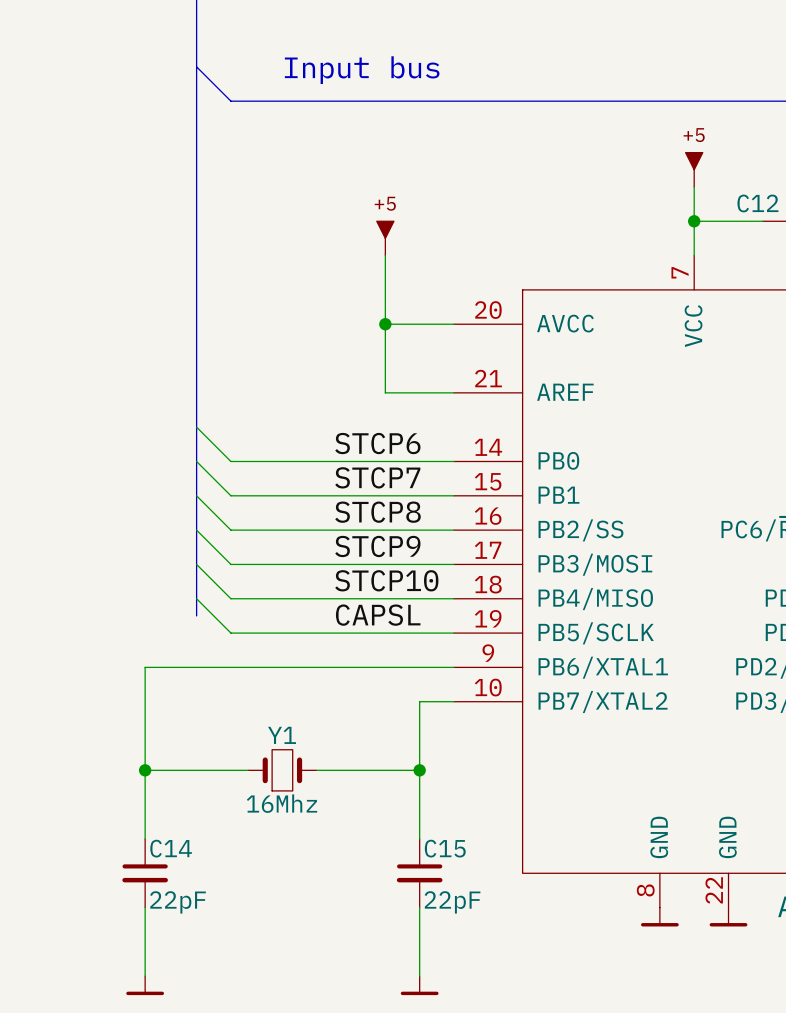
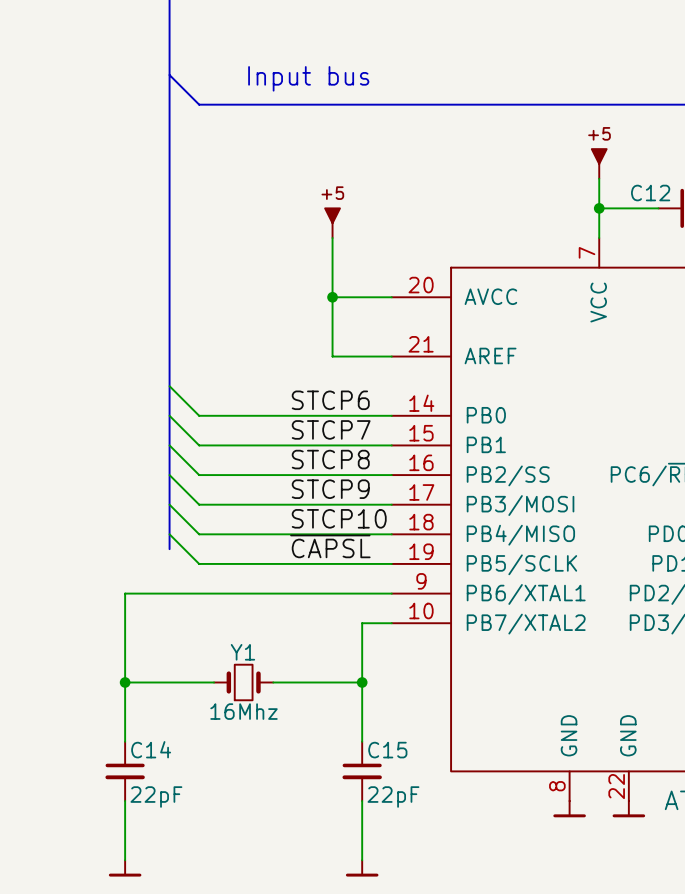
label: CAPSL (378, 615) -> ~{CAPSL} (330, 546)

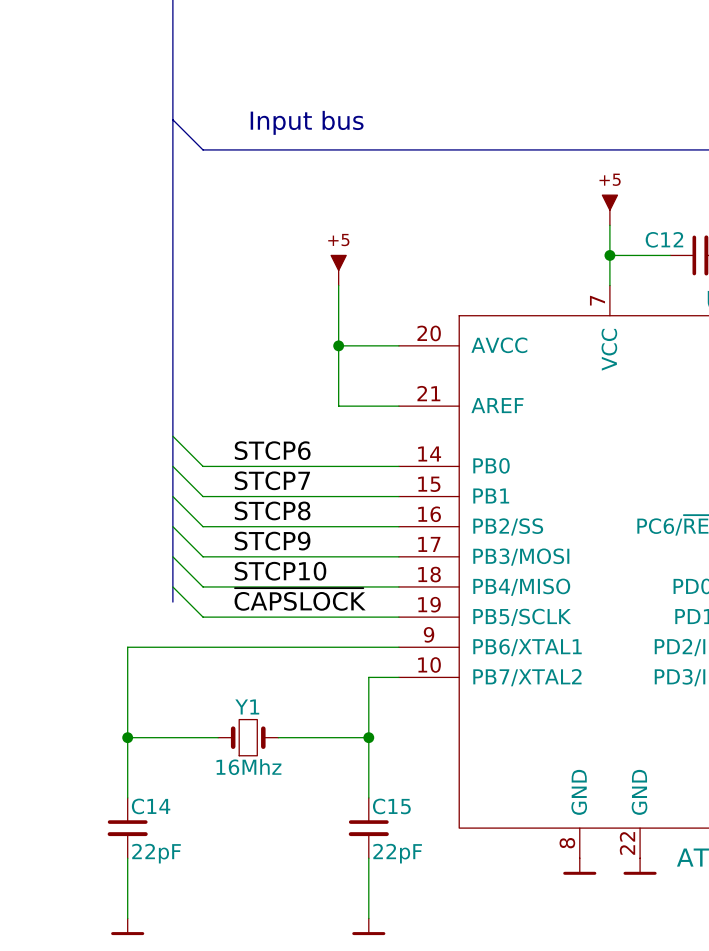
label position: STCP6 (330, 400) -> STCP6 (272, 450)
label position: STCP7 (331, 429) -> STCP7 (272, 480)
label position: STCP8 (330, 459) -> STCP8 (272, 510)
label position: STCP9 (330, 489) -> STCP9 (272, 541)
label position: STCP10 (339, 518) -> STCP10 (280, 571)
label: ~{CAPSL} (330, 546) -> ~{CAPSLOCK} (300, 599)

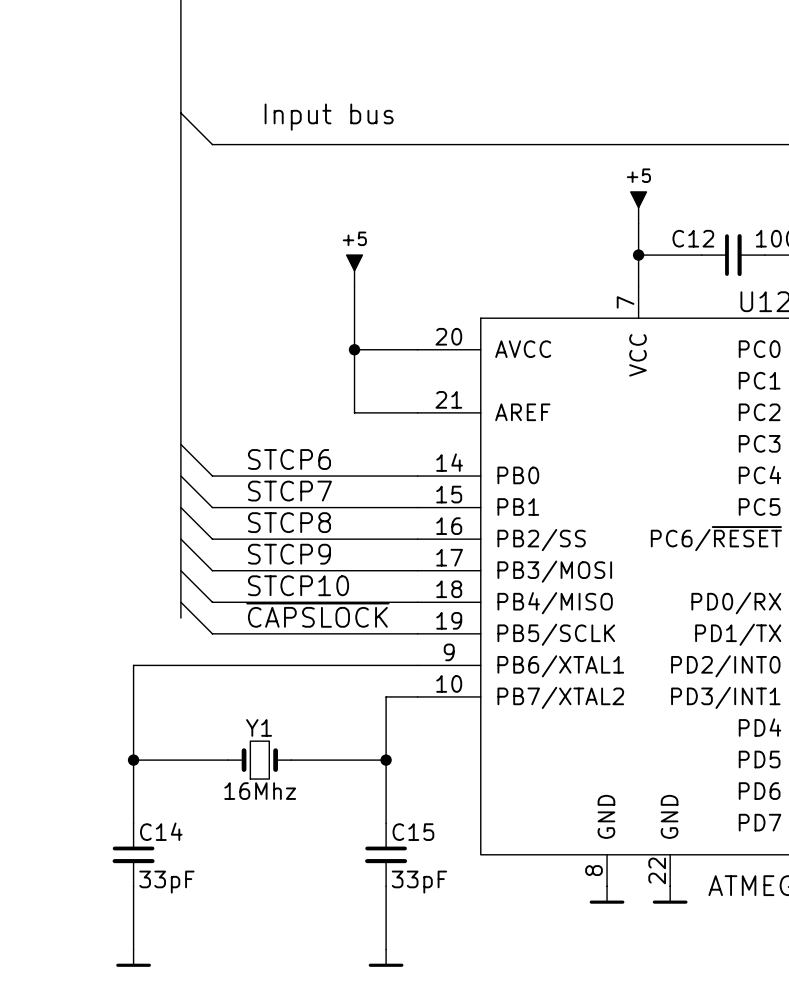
C14 value: 22pF (156, 853) -> 33pF (166, 882)
C15 value: 22pF (397, 853) -> 33pF (419, 882)

